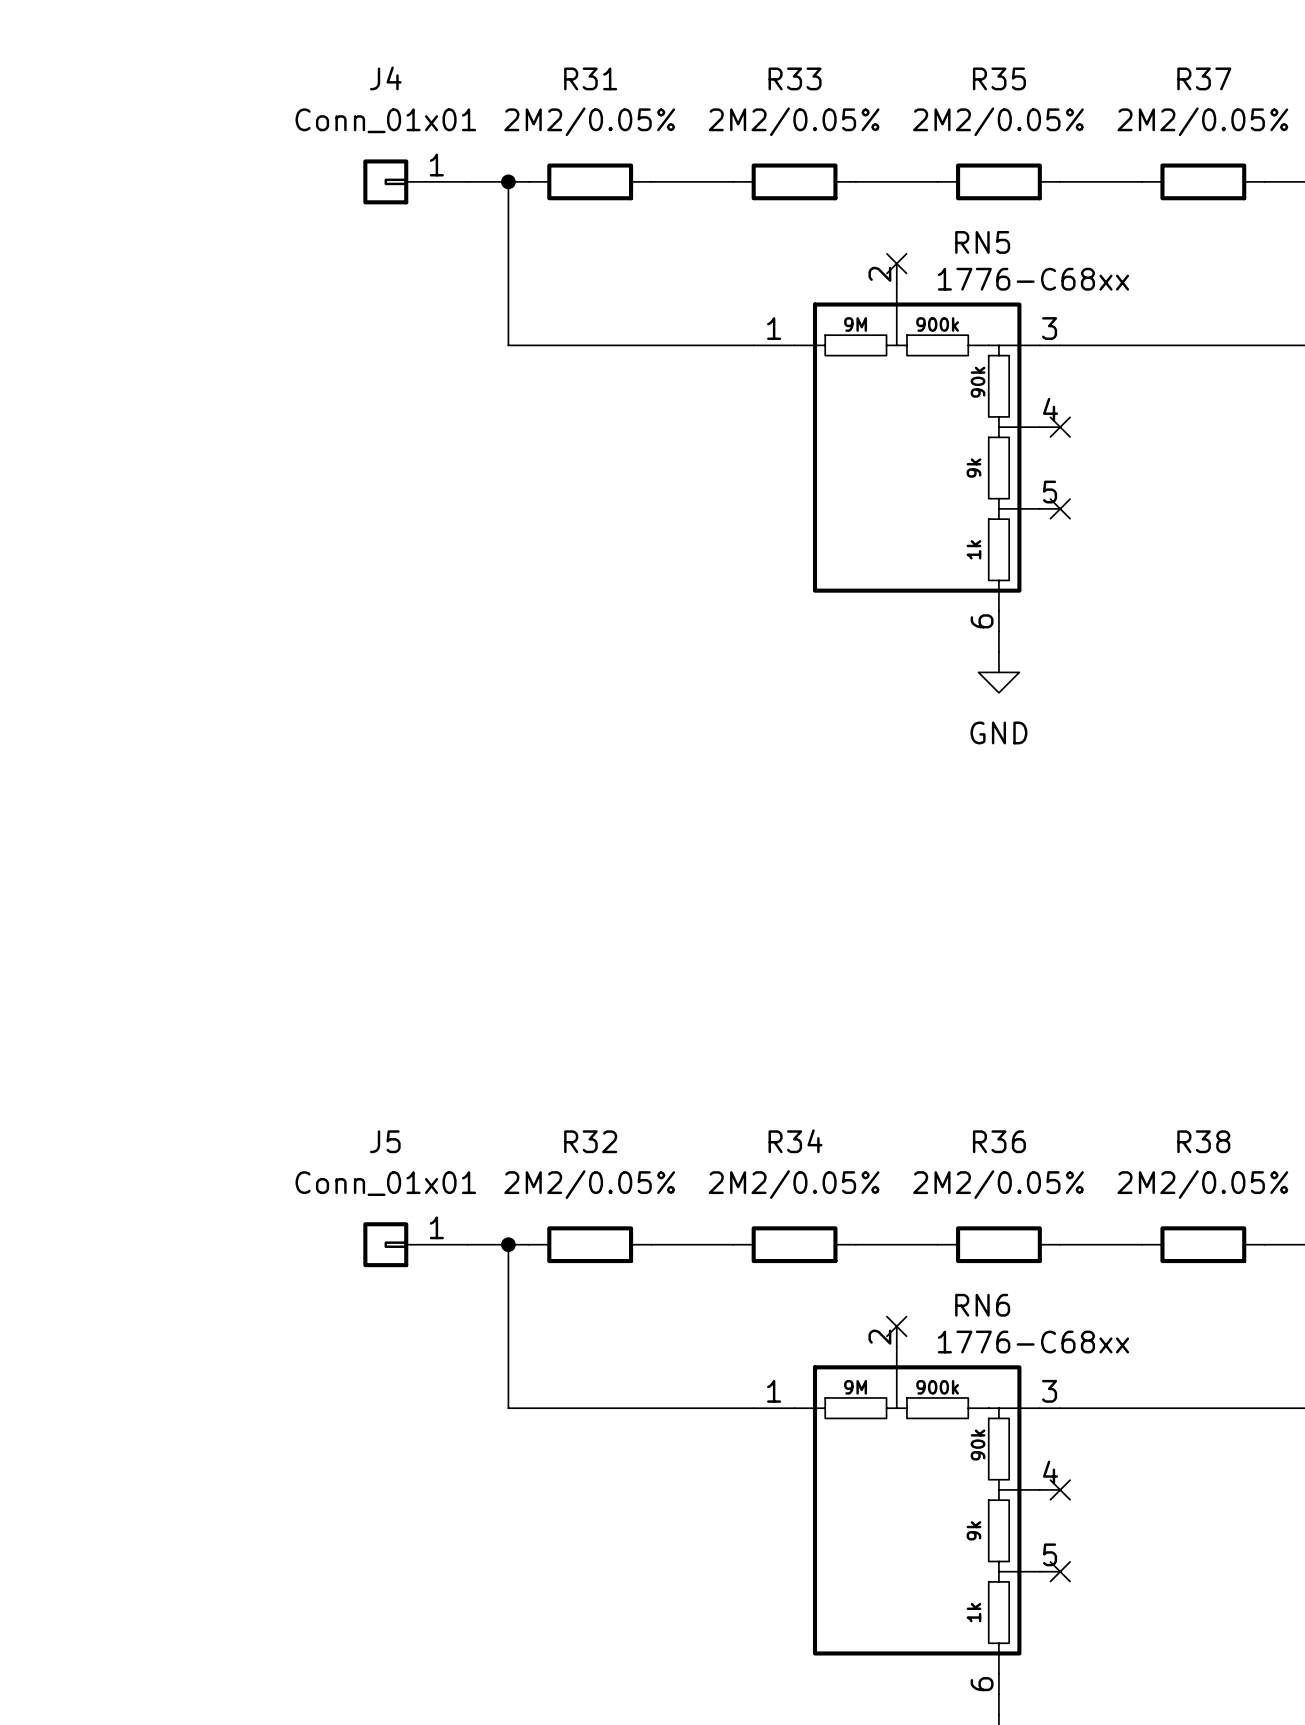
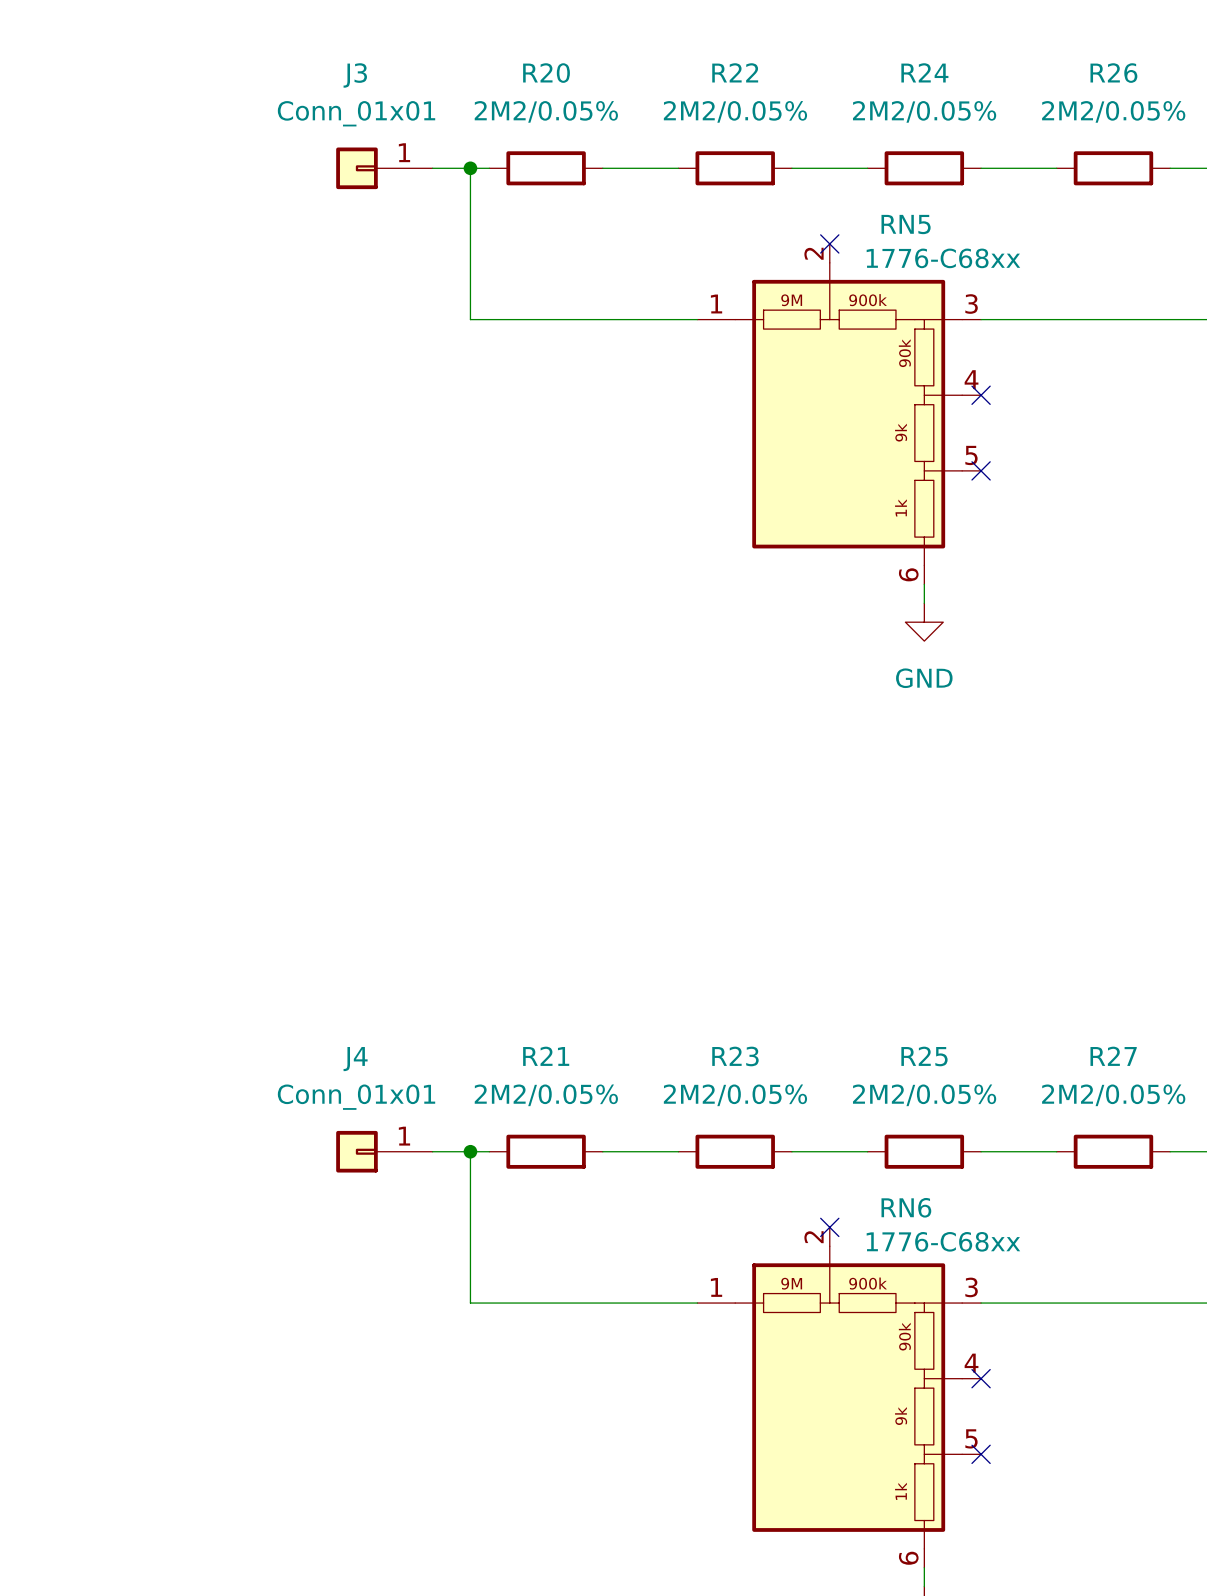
J4 name: J4 (385, 78) -> J3 (355, 75)
R31 name: R31 (590, 78) -> R20 (546, 73)
R33 name: R33 (795, 78) -> R22 (735, 72)
R35 name: R35 (999, 78) -> R24 (924, 72)
R37 name: R37 (1204, 78) -> R26 (1113, 73)
J5 name: J5 (385, 1141) -> J4 (355, 1059)
R32 name: R32 (590, 1141) -> R21 (546, 1056)
R34 name: R34 (795, 1141) -> R23 (735, 1056)
R36 name: R36 (999, 1141) -> R25 (924, 1056)
R38 name: R38 (1203, 1141) -> R27 (1113, 1056)

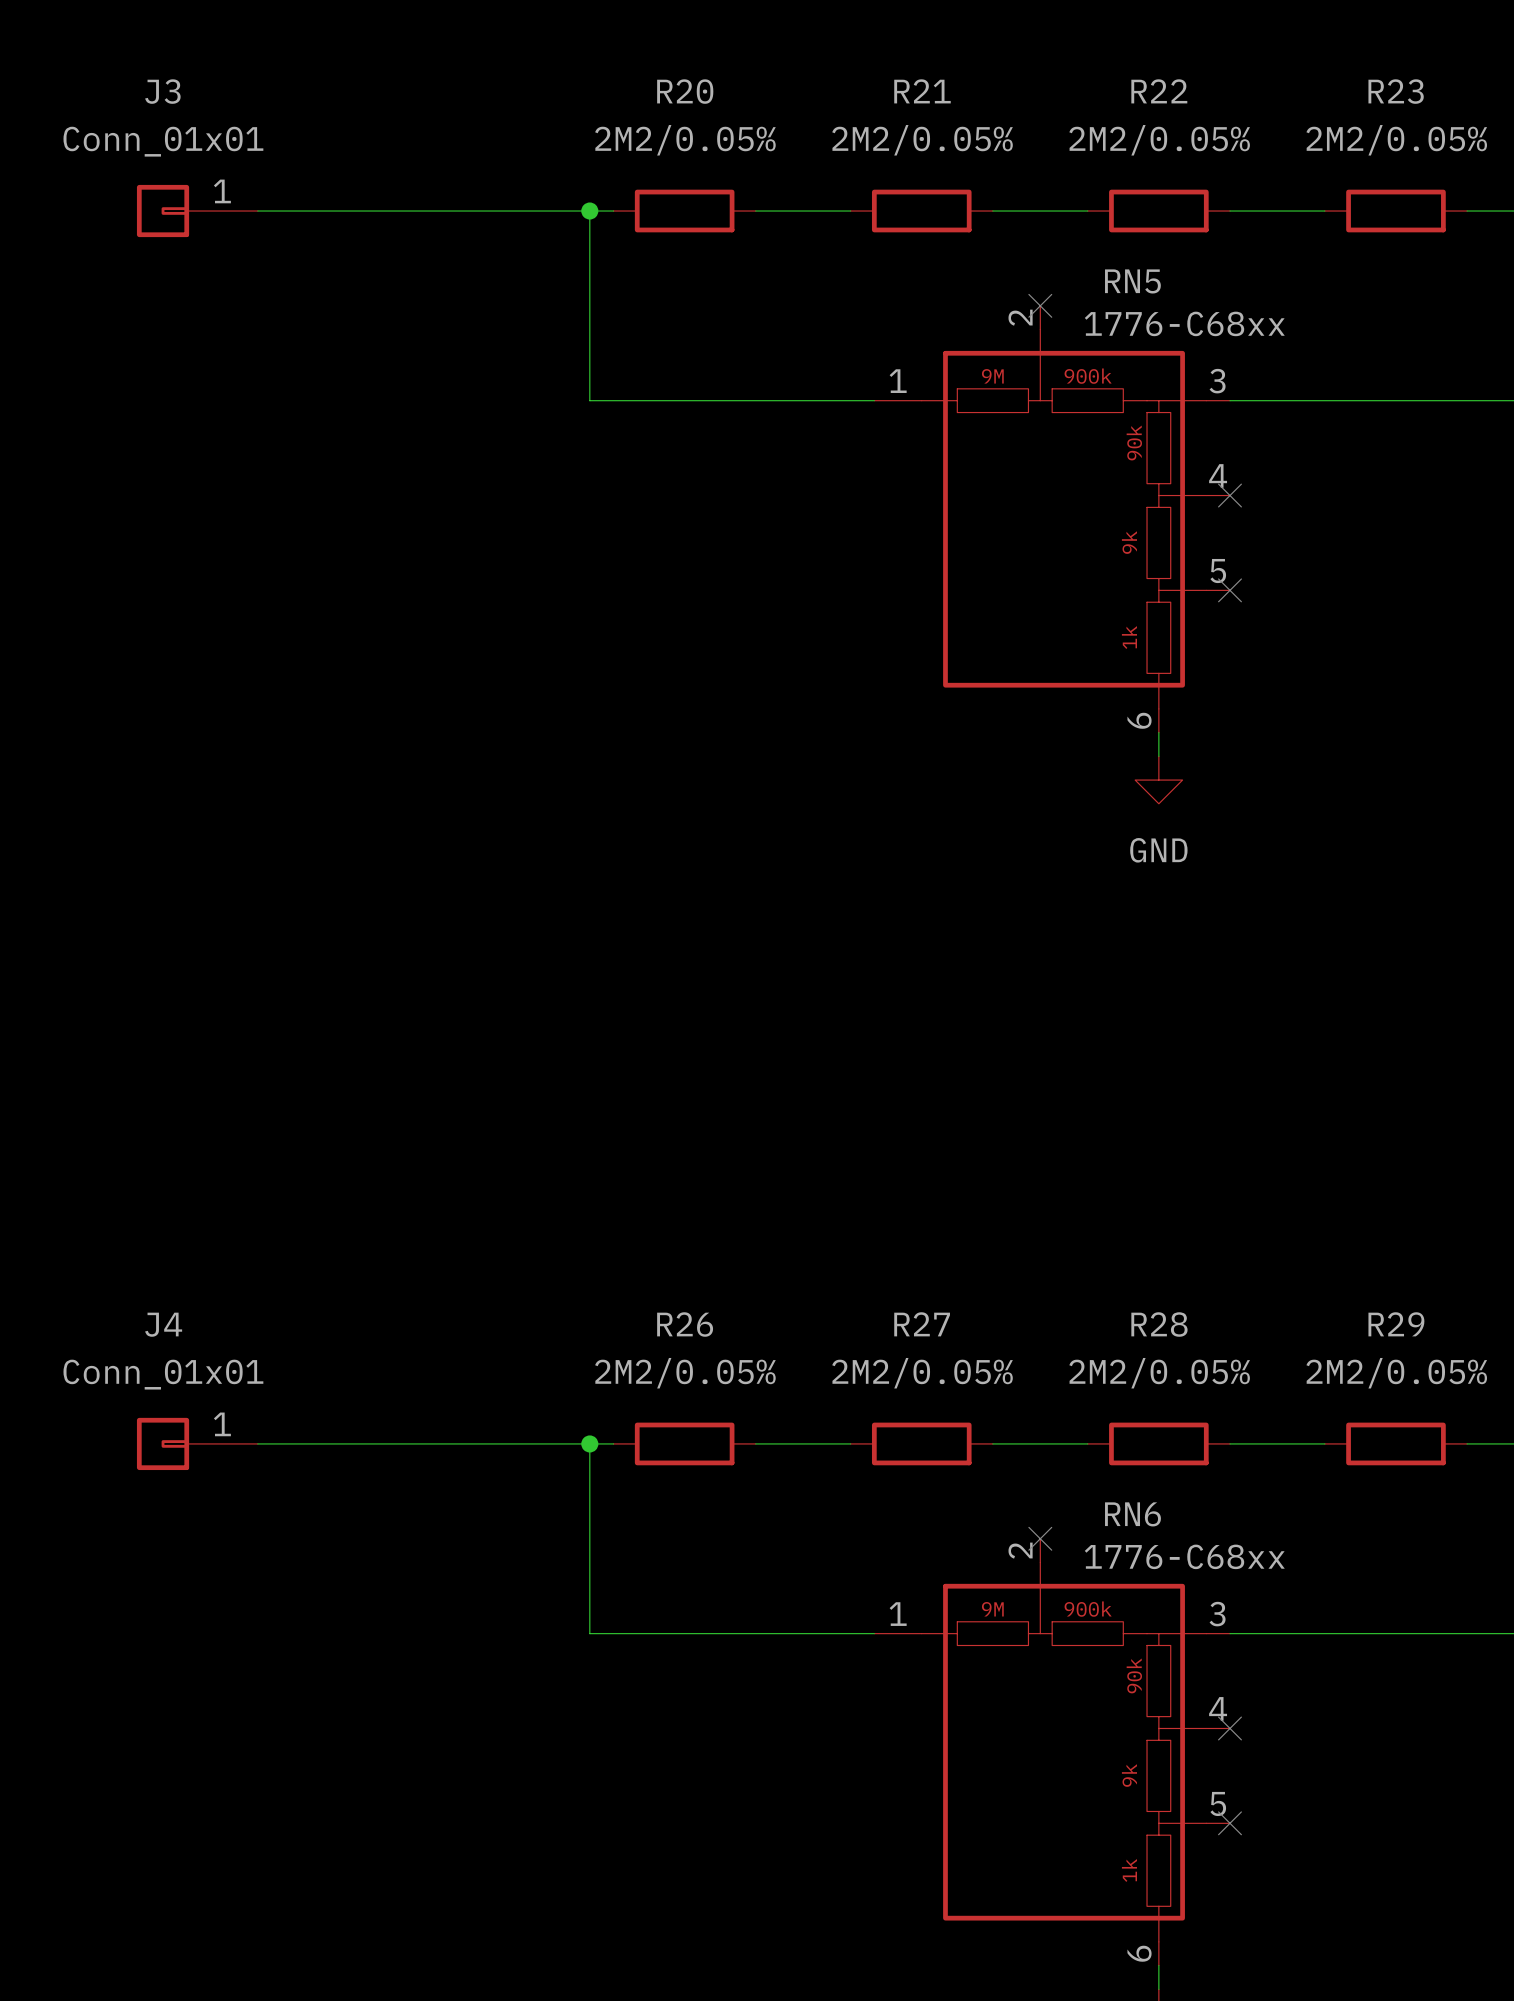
R22 name: R22 (735, 72) -> R21 (922, 91)
R24 name: R24 (924, 72) -> R22 (1159, 91)
R26 name: R26 (1113, 73) -> R23 (1396, 91)
wire: none -> (257, 211) (542, 211)
J3 position: (384, 168) -> (197, 211)
R21 name: R21 (546, 1056) -> R26 (685, 1324)
R23 name: R23 (735, 1056) -> R27 (922, 1324)
R25 name: R25 (924, 1056) -> R28 (1159, 1324)
R27 name: R27 (1113, 1056) -> R29 (1396, 1324)
wire: none -> (257, 1443) (542, 1443)
J4 position: (384, 1151) -> (197, 1443)

